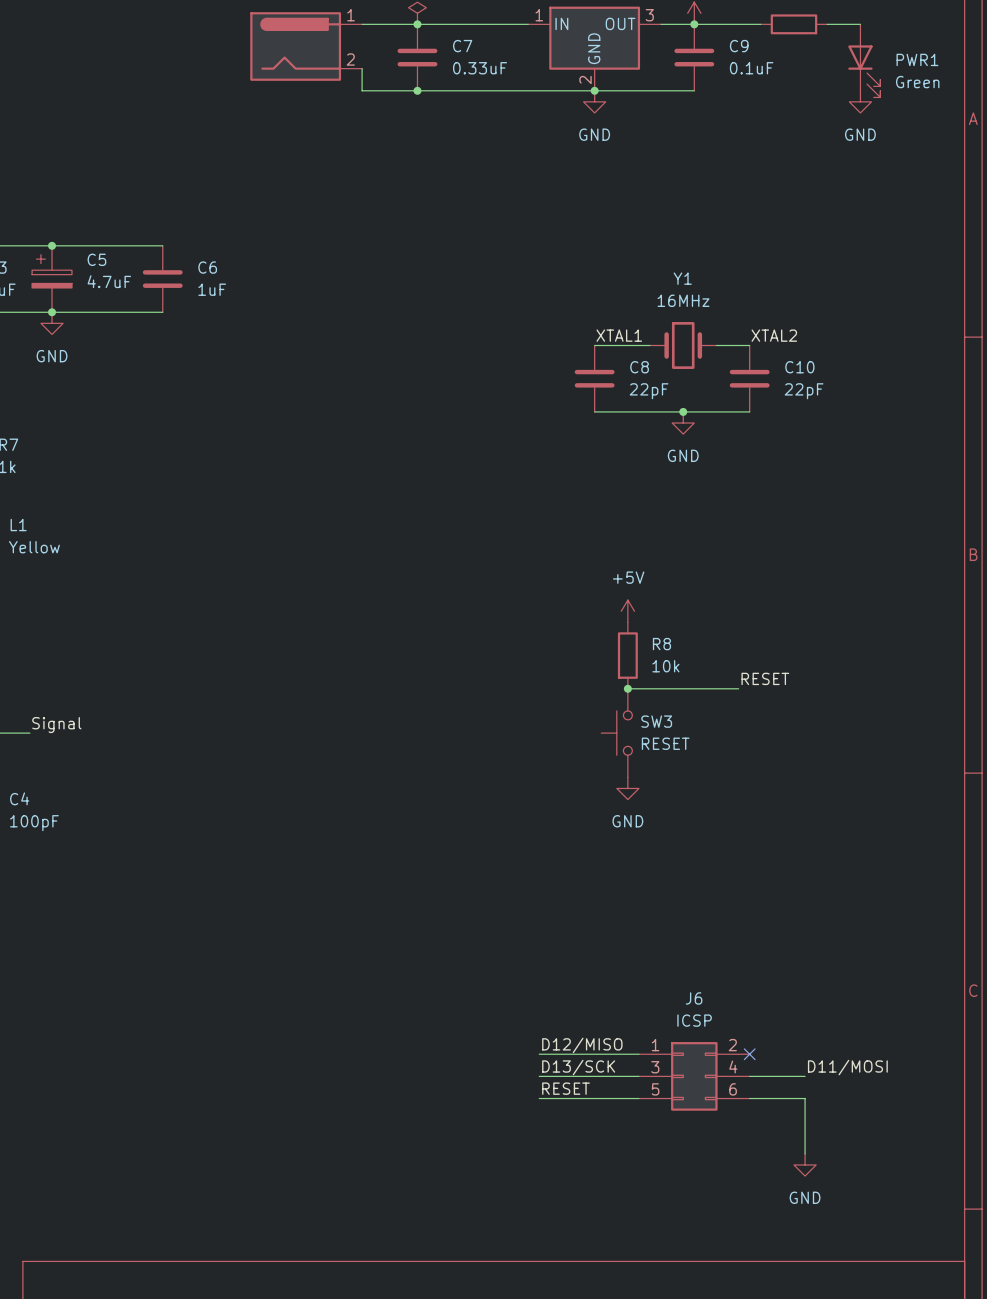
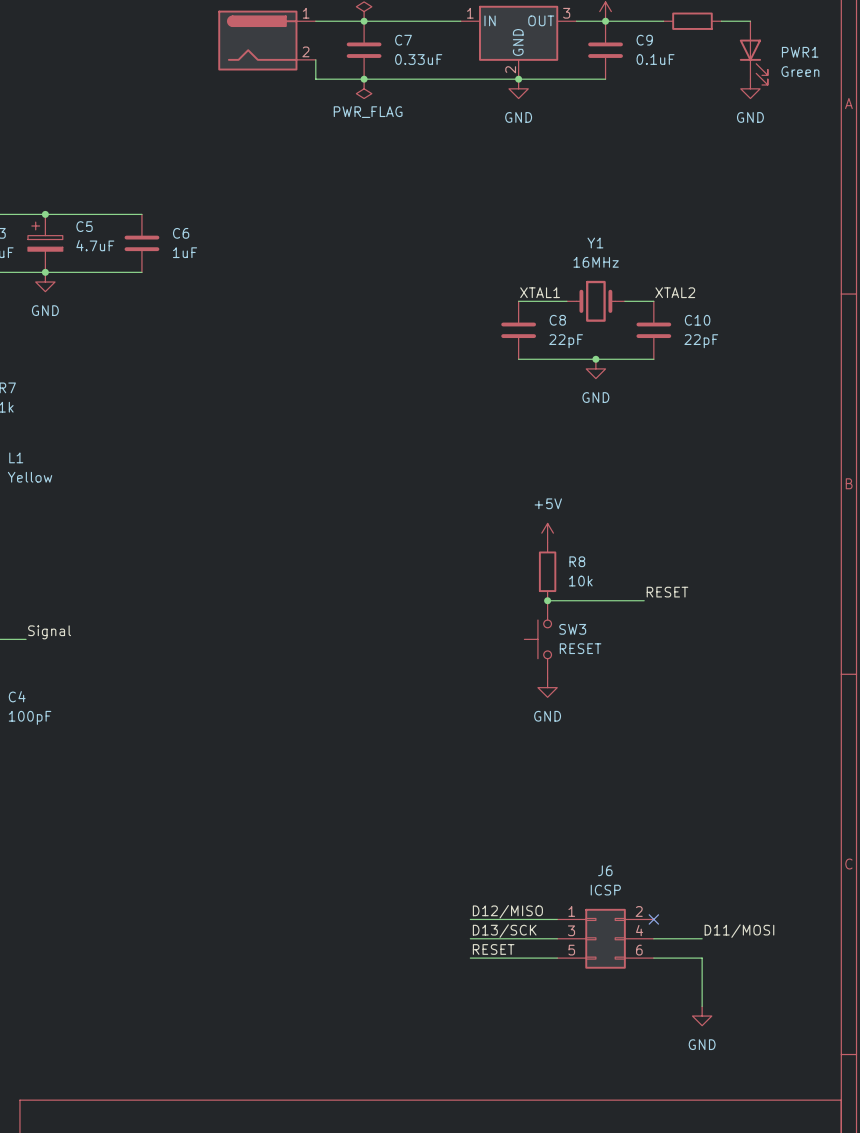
power symbol: none -> PWR_FLAG (364, 88)

